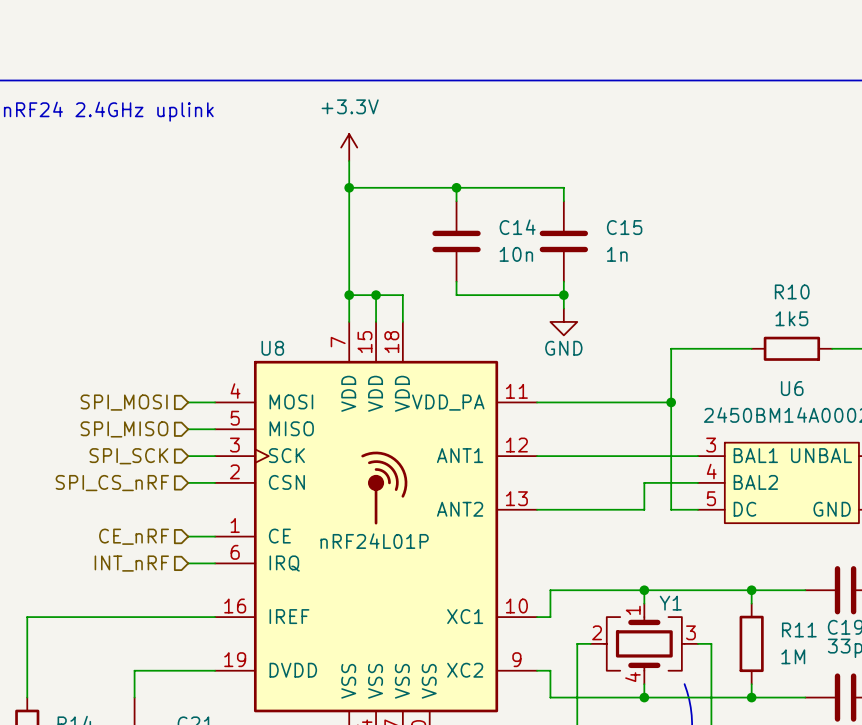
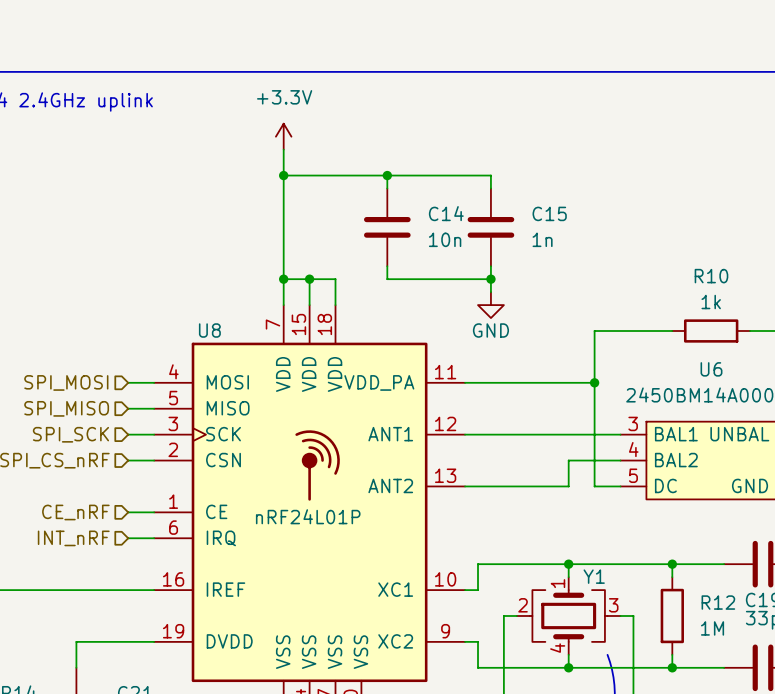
R10 value: 1k5 (791, 318) -> 1k (711, 302)
R11 name: R11 (799, 629) -> R12 (718, 602)

